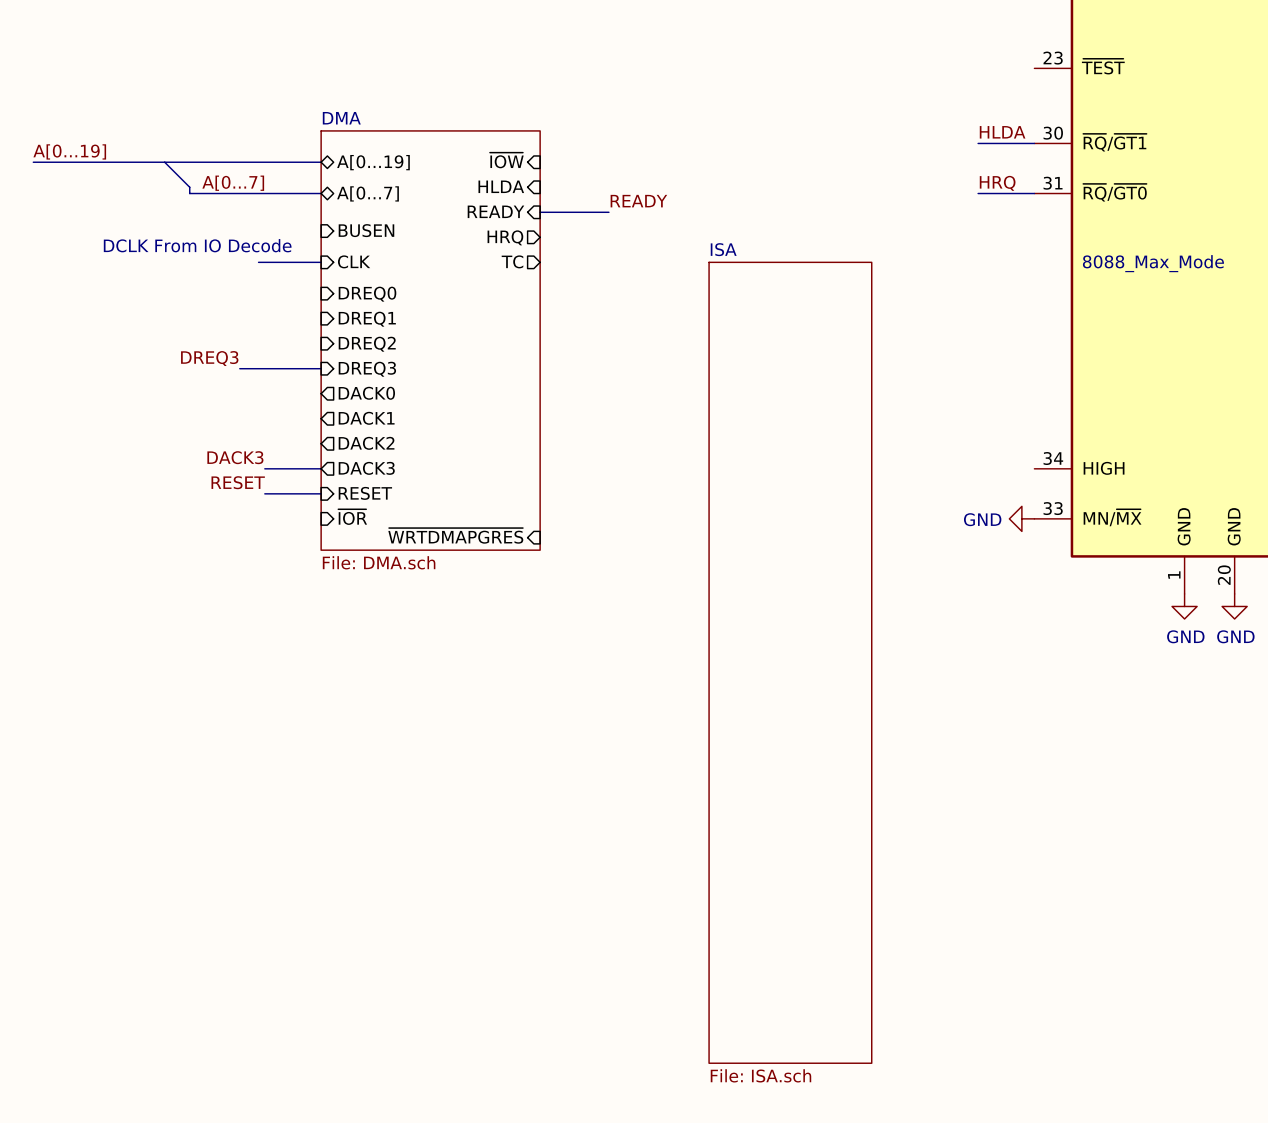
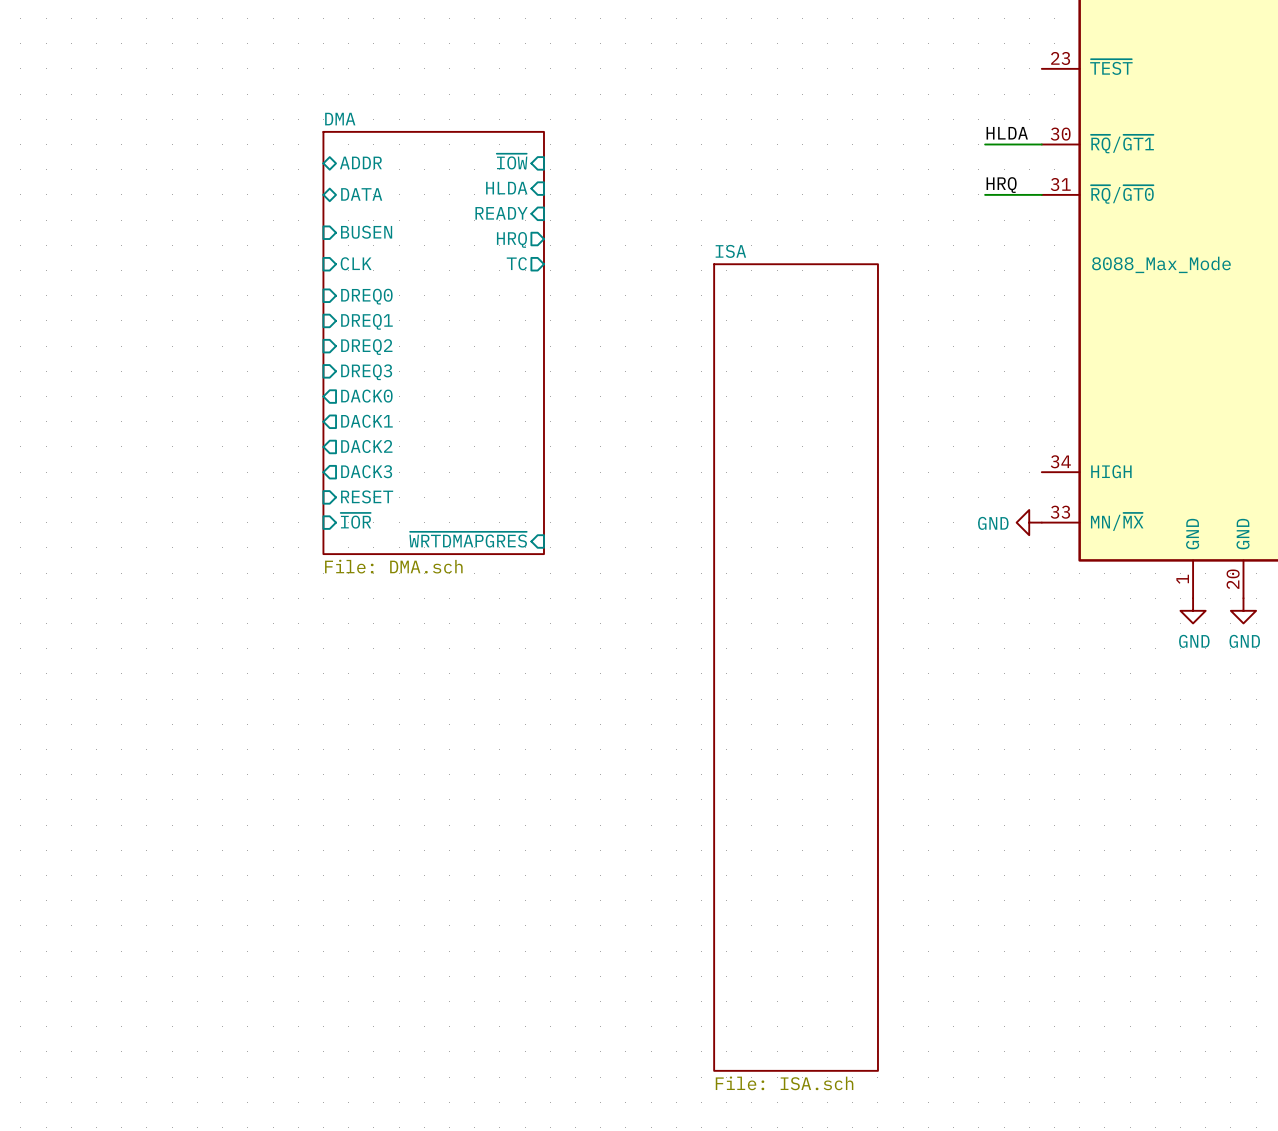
label: A[0...19] (69, 151) -> none
bus: (33, 162) (321, 162) -> none
bus: (164, 162) (189, 187) (189, 193) (321, 193) -> none
sheet pin: A[0...19] (373, 162) -> ADDR (360, 162)
label: A[0...7] (233, 183) -> none
sheet pin: A[0...7] (368, 193) -> DATA (361, 194)
label: READY (638, 201) -> none
wire: (540, 212) (608, 212) -> none
text: DCLK From IO Decode (197, 245) -> none
wire: (258, 262) (321, 262) -> none
label: DREQ3 (209, 358) -> none
wire: (239, 368) (321, 368) -> none
label: DACK3 (235, 457) -> none
wire: (264, 468) (321, 468) -> none
label: RESET (238, 482) -> none
wire: (264, 493) (321, 493) -> none

